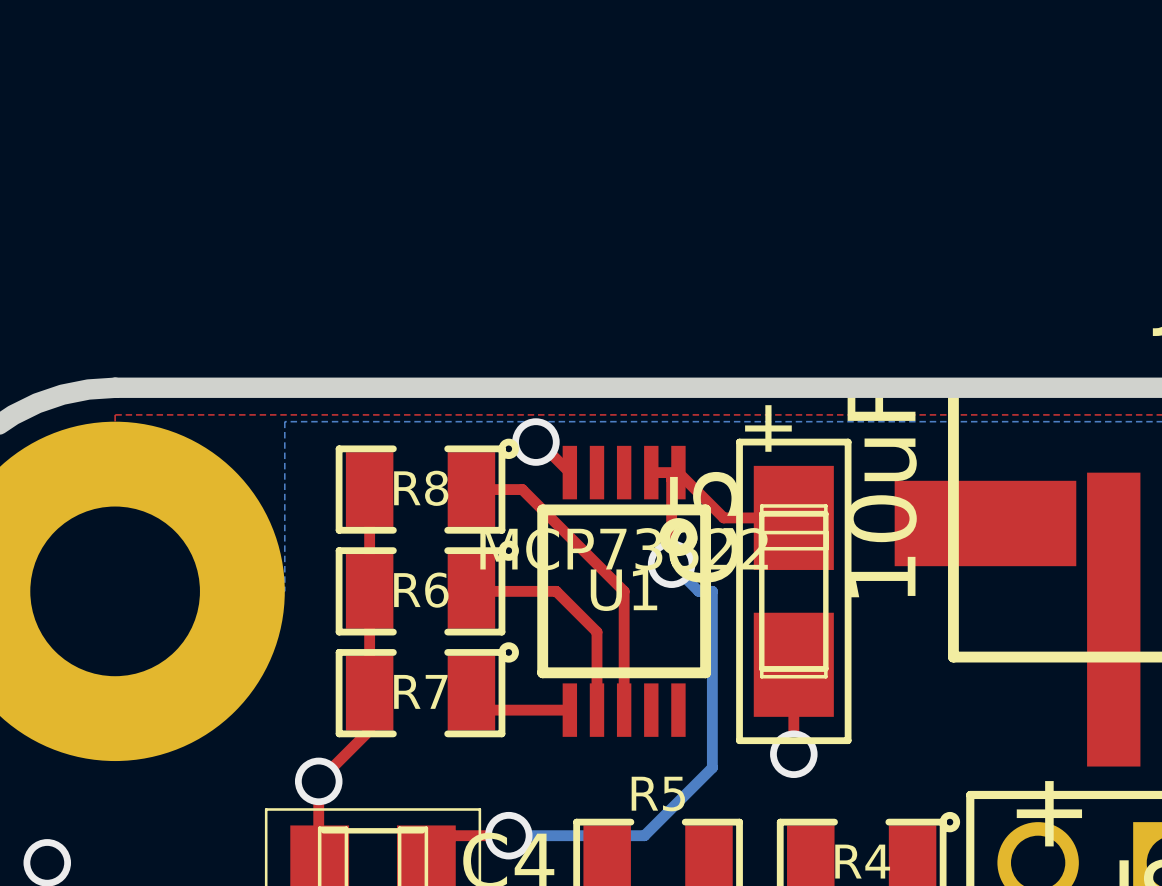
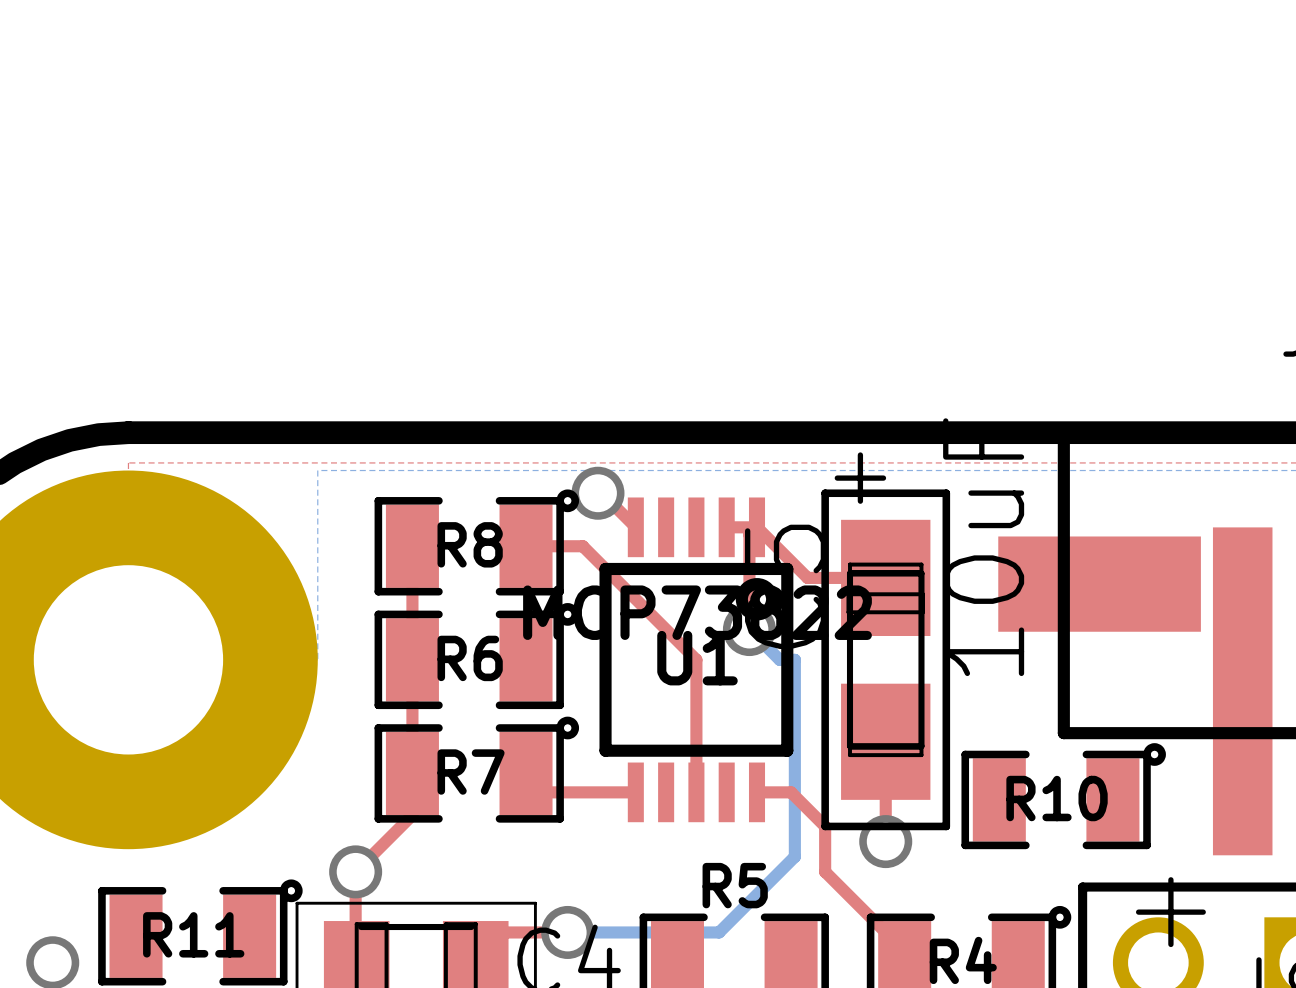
top track: (471, 591) (556, 591) (596, 632) (596, 710) -> none
top track: none -> (757, 792) (791, 792) (825, 826) (825, 871) (904, 951) (904, 962)
R10: none -> (1063, 796)
R11: none -> (200, 932)

